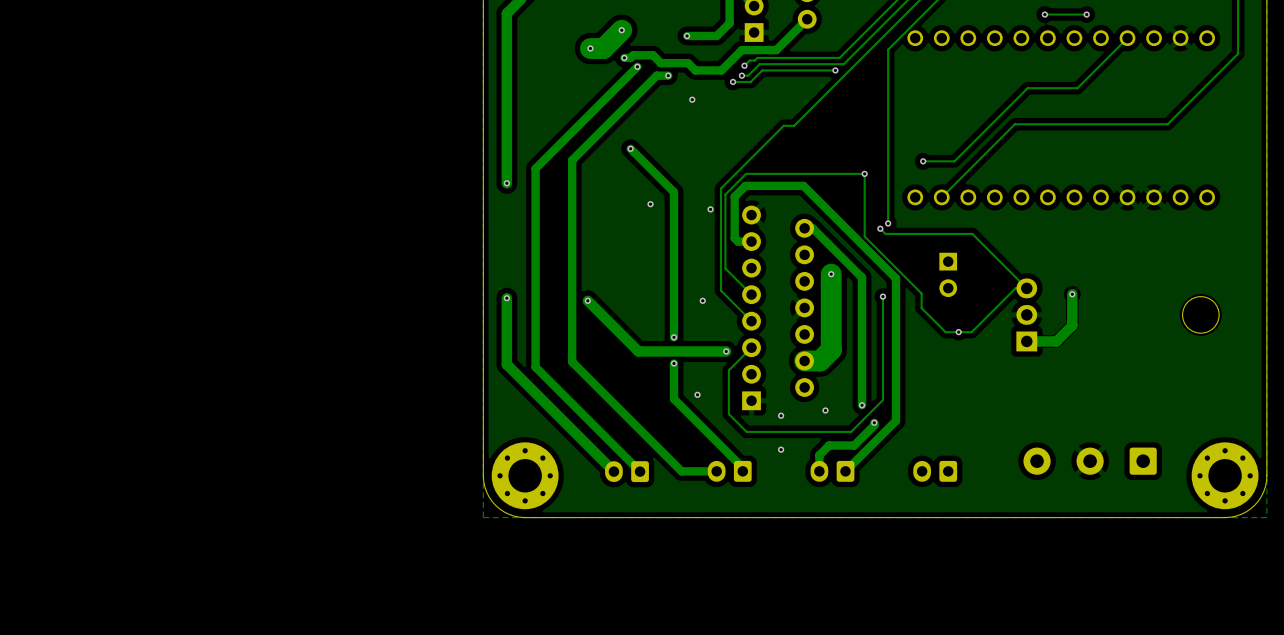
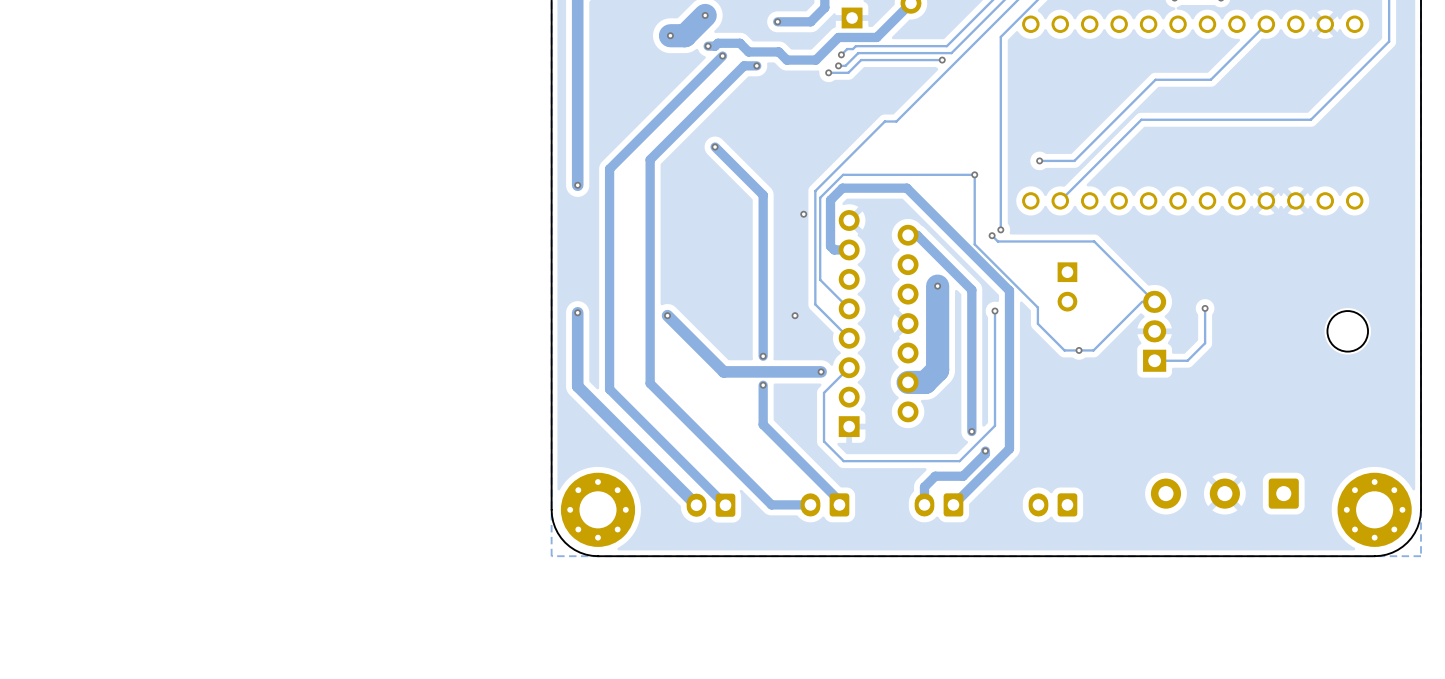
via: (692, 99) -> none
via: (650, 204) -> none
track width: thick (1072, 294) (1072, 325) (1056, 341) (1026, 341) -> thin (1205, 308) (1205, 343) (1187, 360) (1154, 360)
via: (697, 394) -> none
via: (825, 410) -> none
via: (781, 415) -> none
via: (781, 449) -> none

